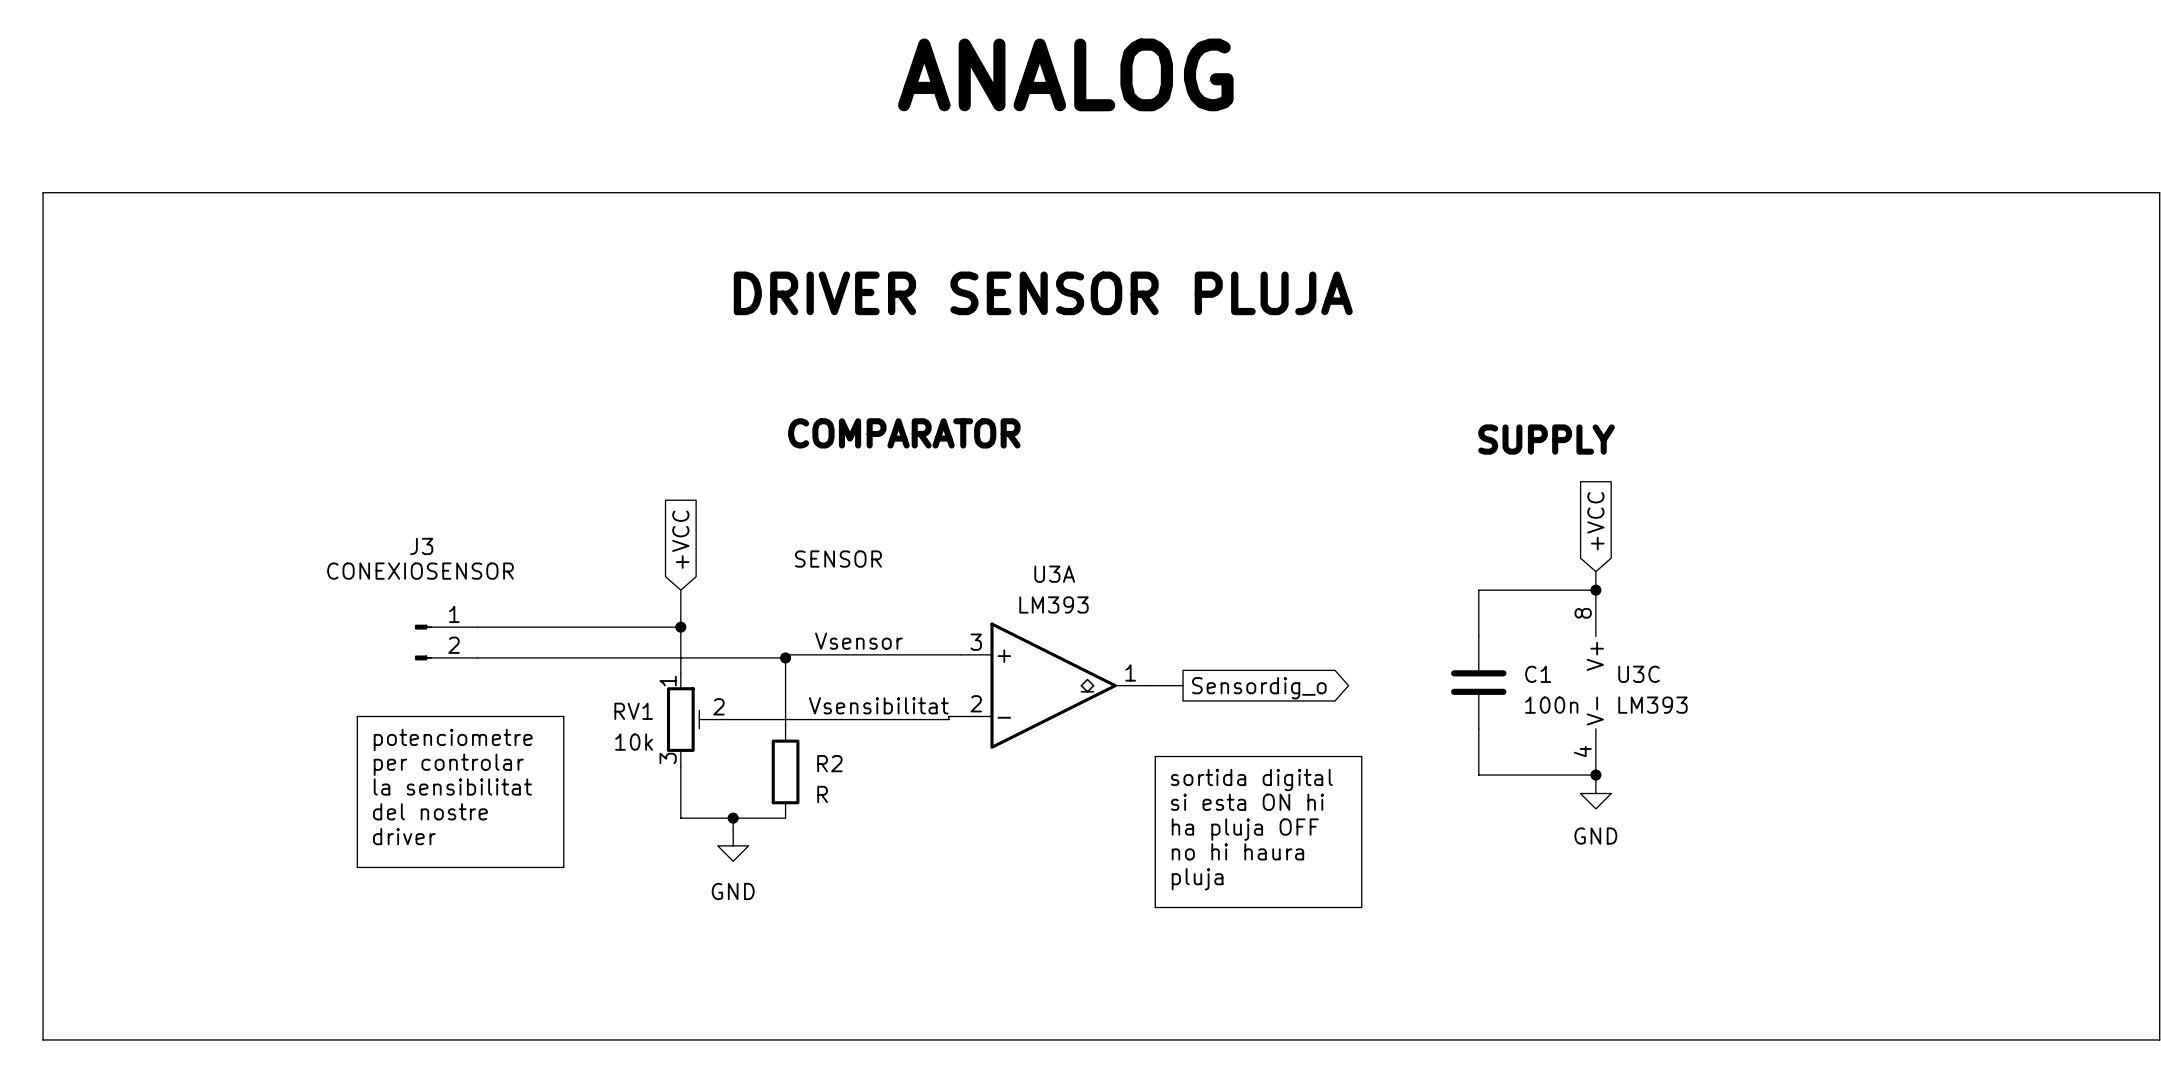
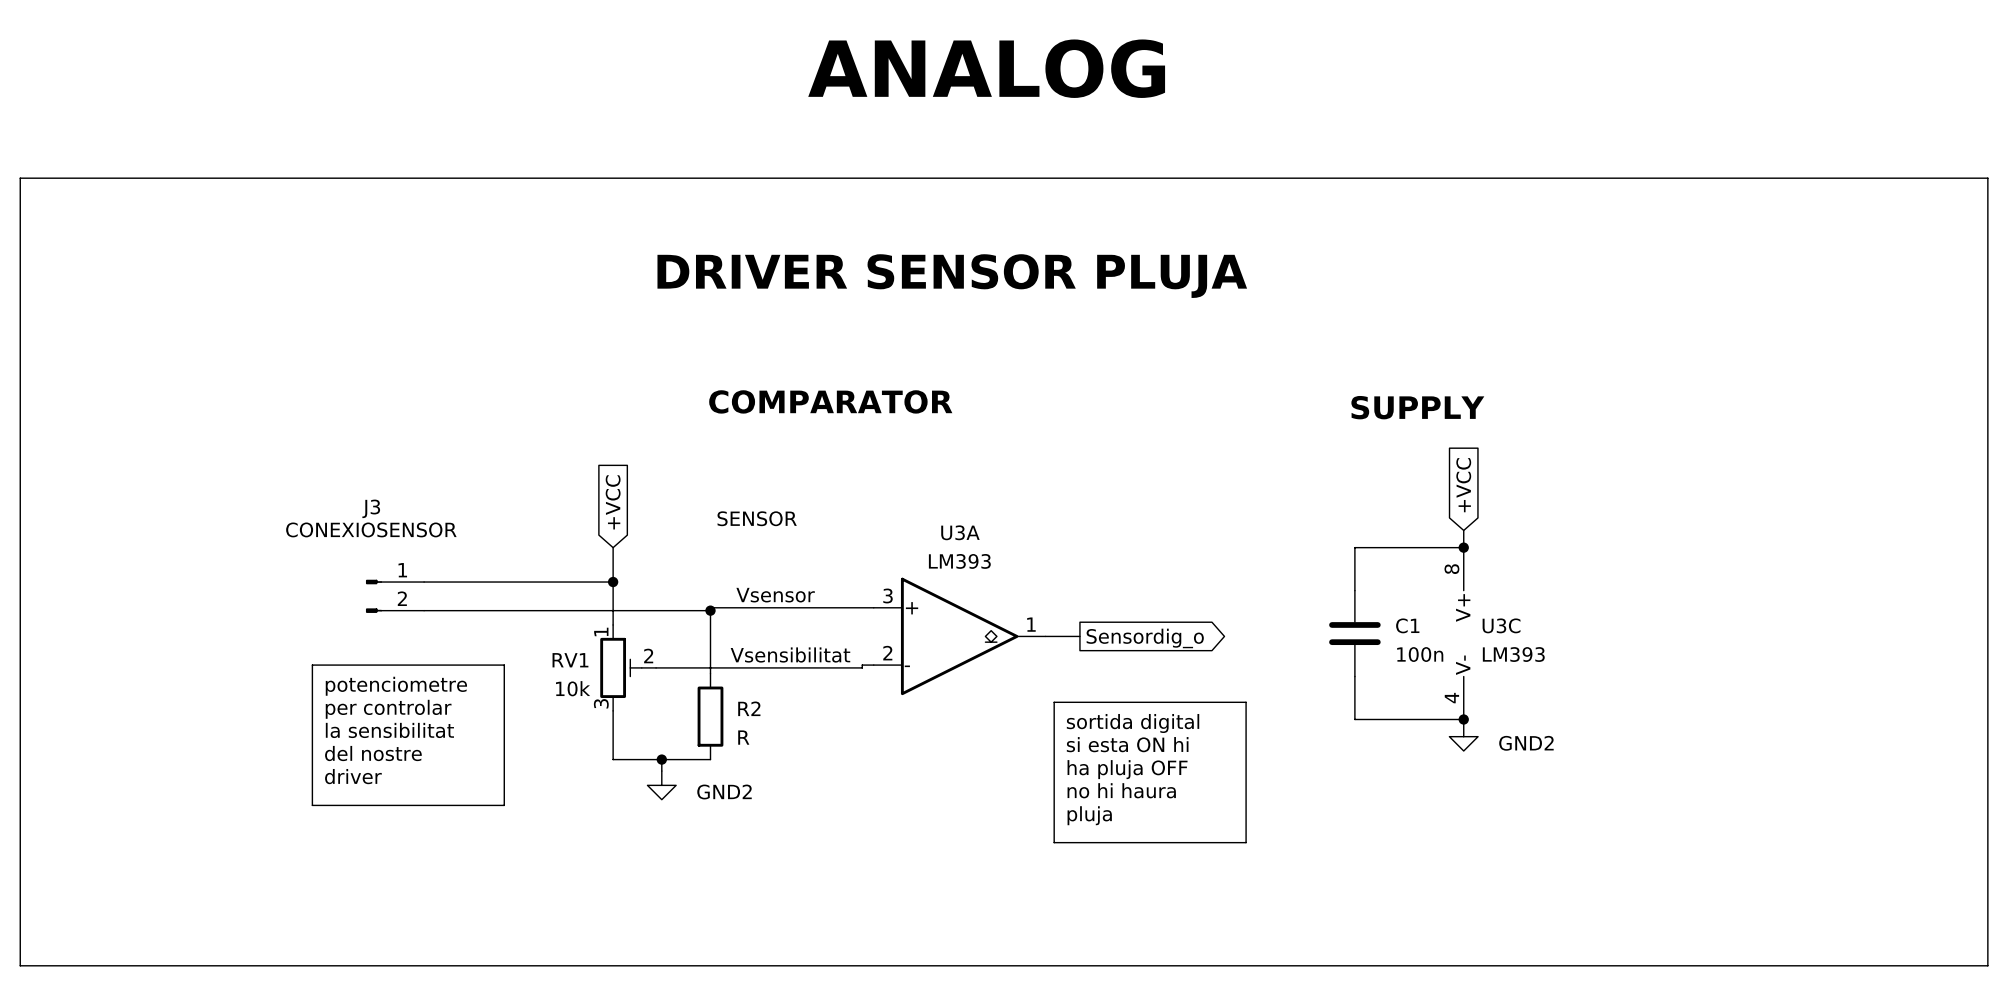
power symbol: GND (1595, 793) -> GND2 (1463, 736)
power symbol: GND (733, 845) -> GND2 (661, 785)

